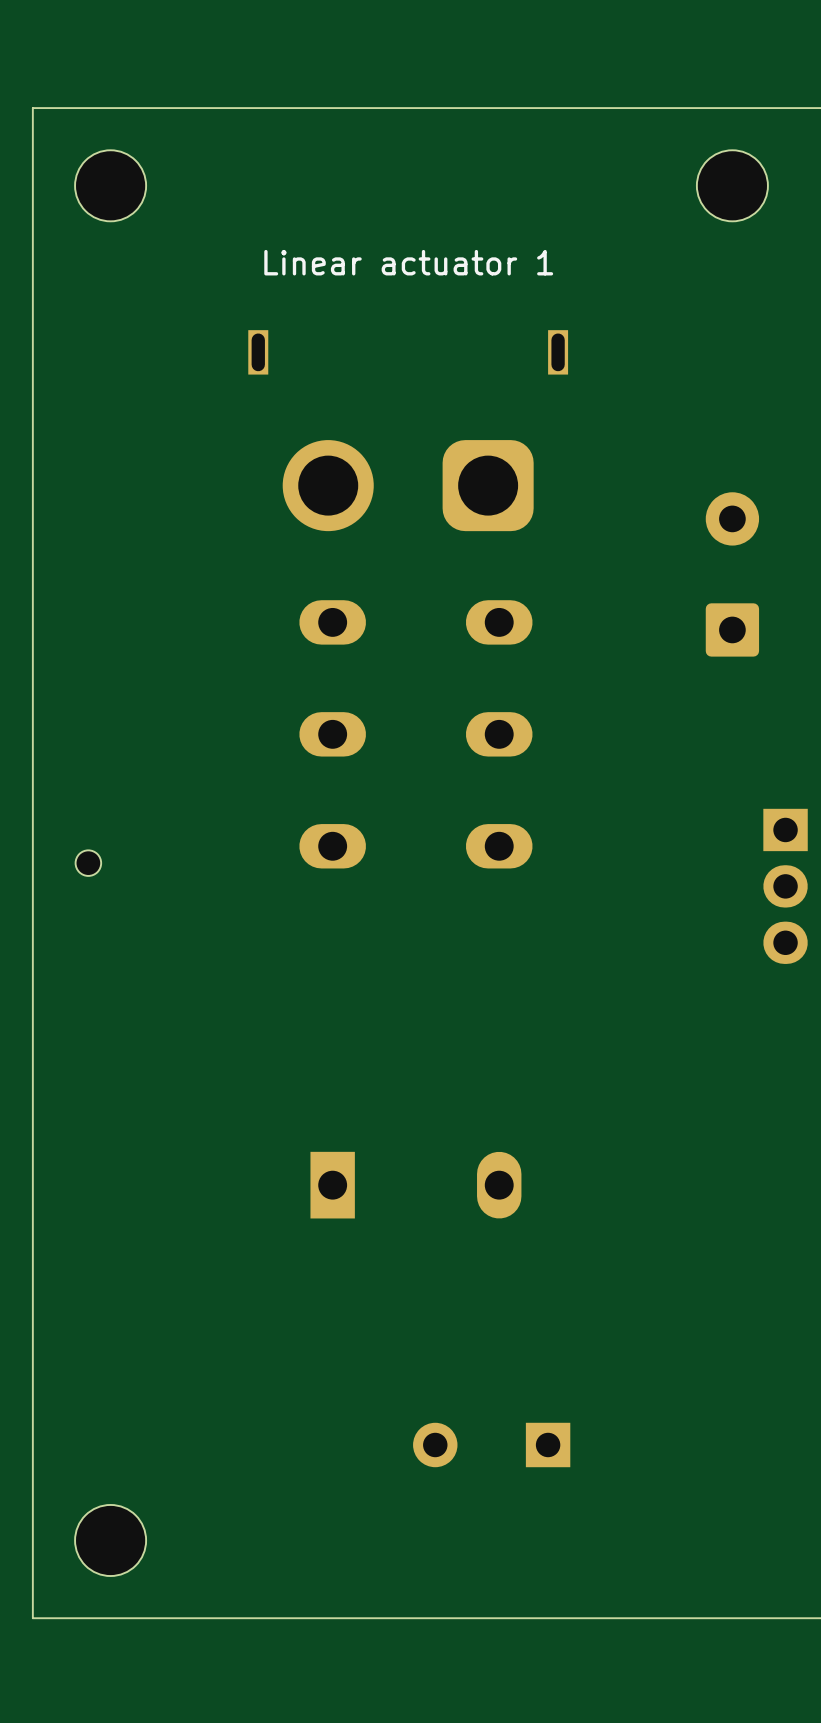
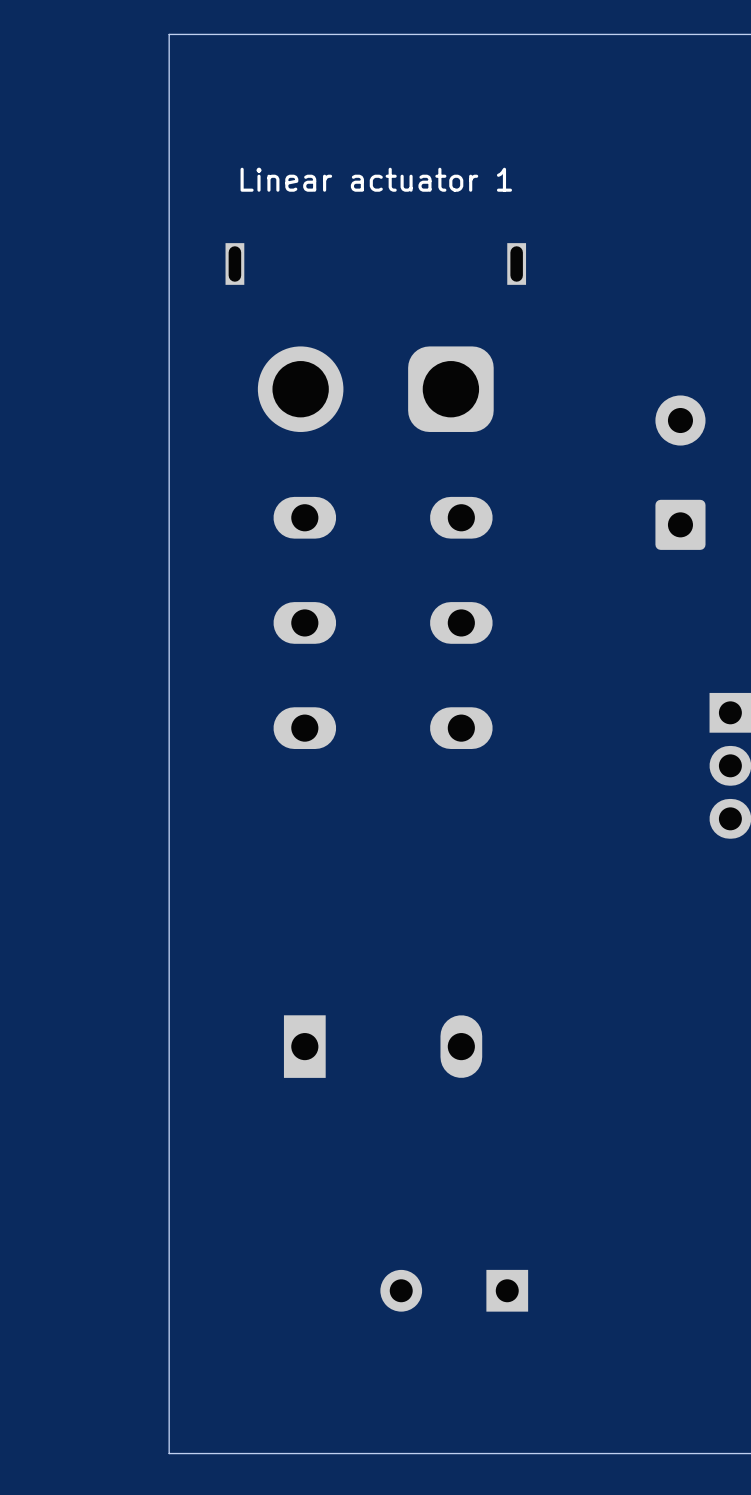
board edge: (188, 108) (32, 108) (32, 1618) (188, 1618) -> (169, 34) (169, 1453)
part: (110, 185) -> none
part: (732, 185) -> none
part: (88, 863) -> none
part: (110, 1540) -> none

